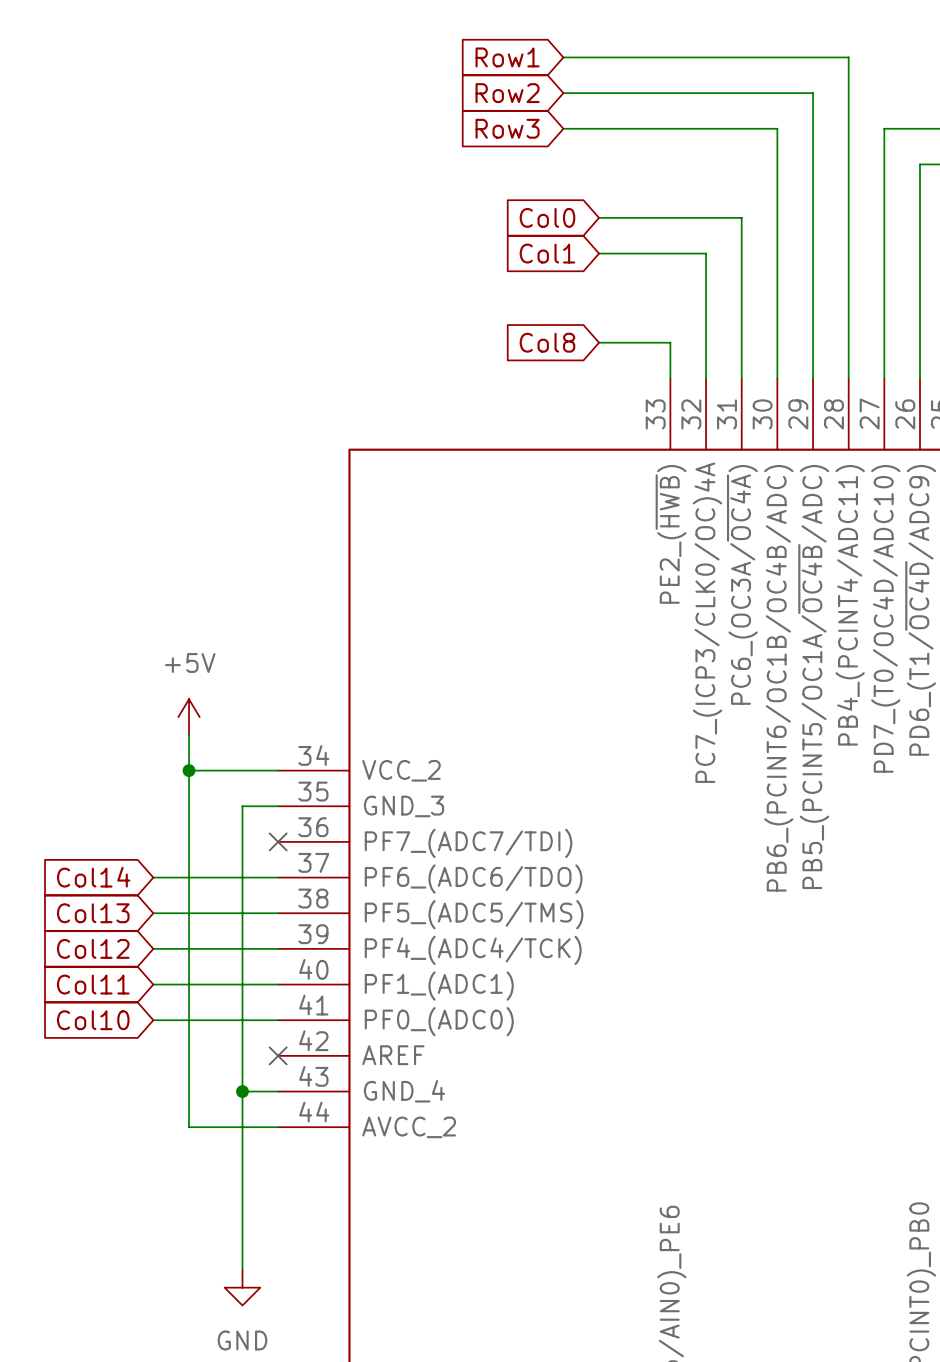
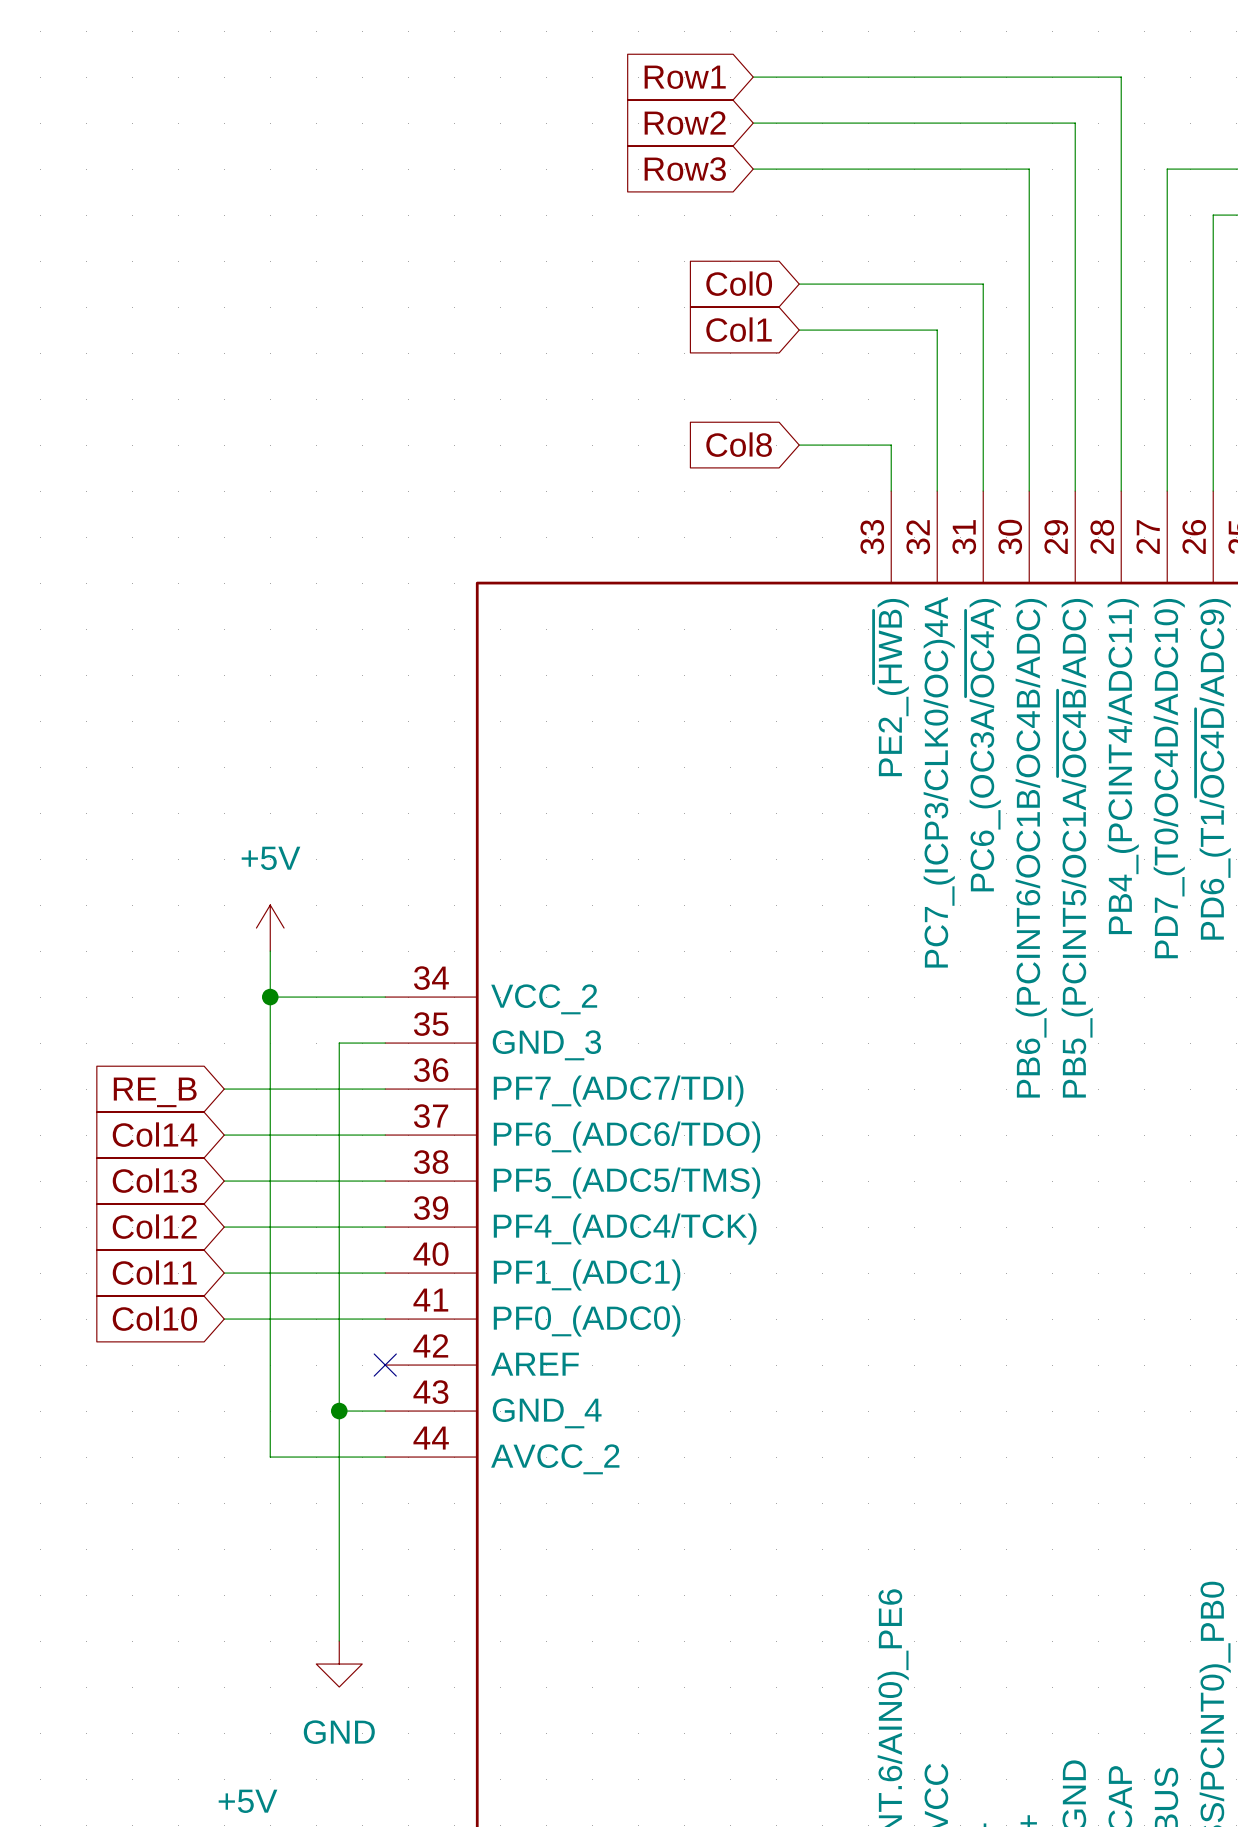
wire: none -> (224, 1089) (385, 1089)
no-connect mark: (278, 841) -> none
global label: none -> RE_B (155, 1092)

